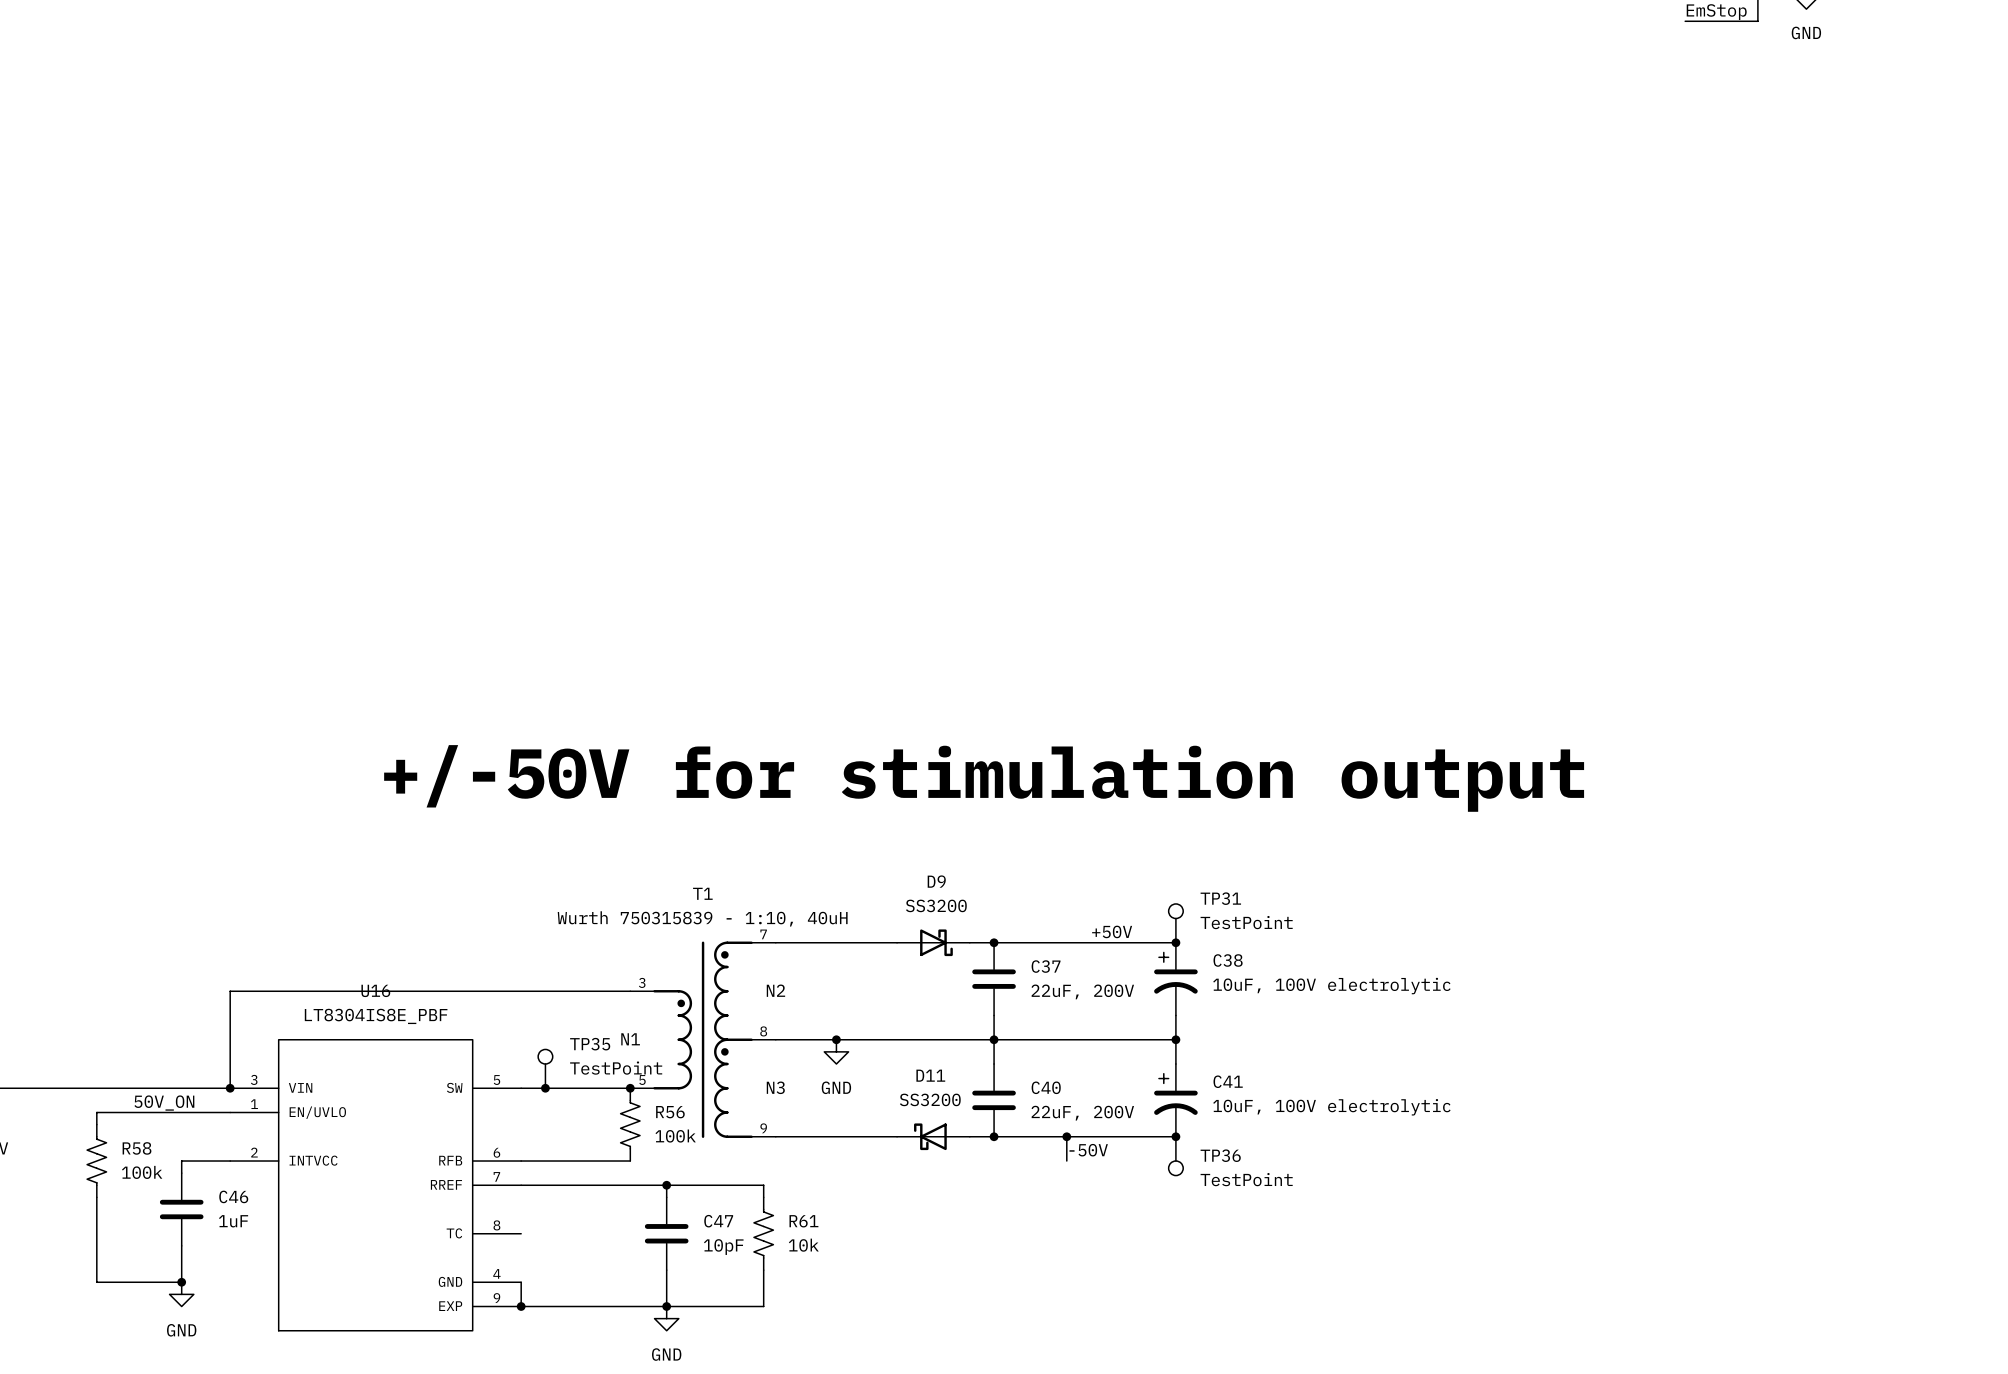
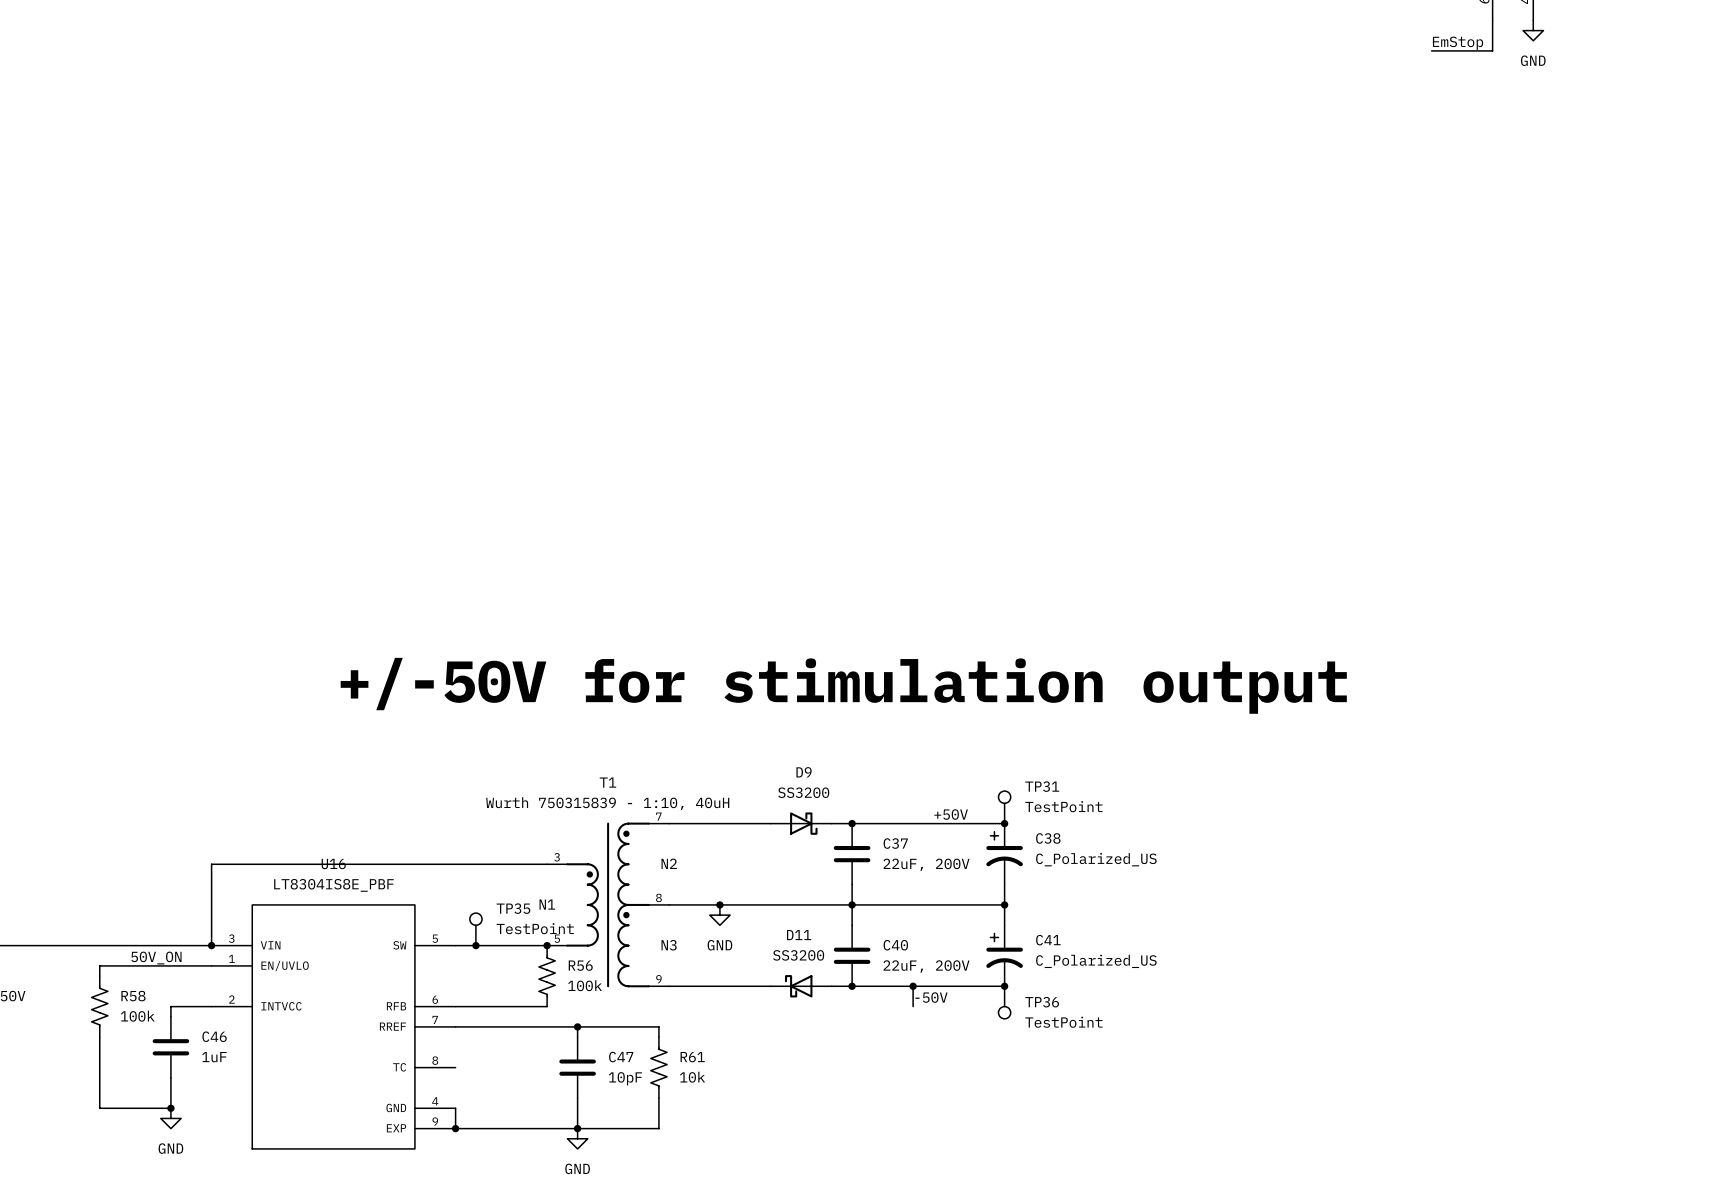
C38 value: 10uF, 100V electrolytic (1331, 986) -> C_Polarized_US (1096, 859)
C41 value: 10uF, 100V electrolytic (1331, 1107) -> C_Polarized_US (1096, 961)

